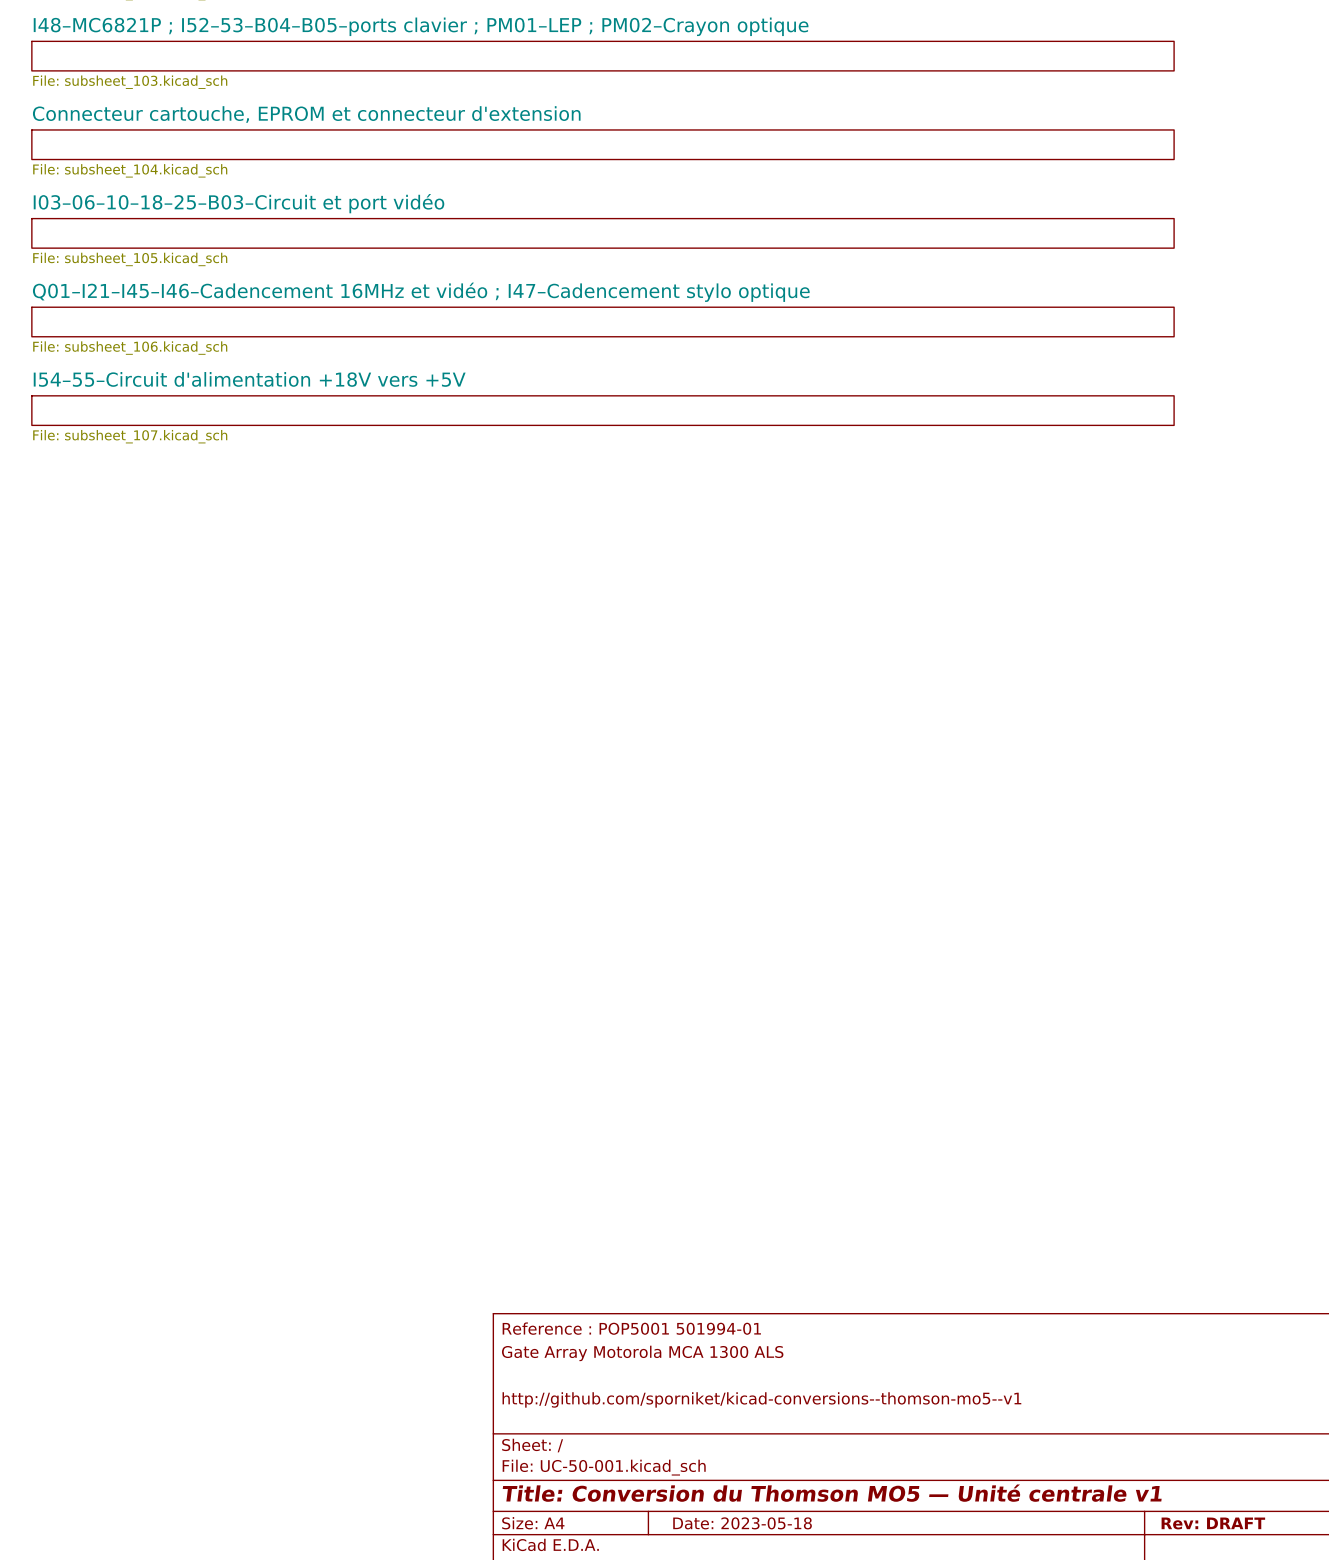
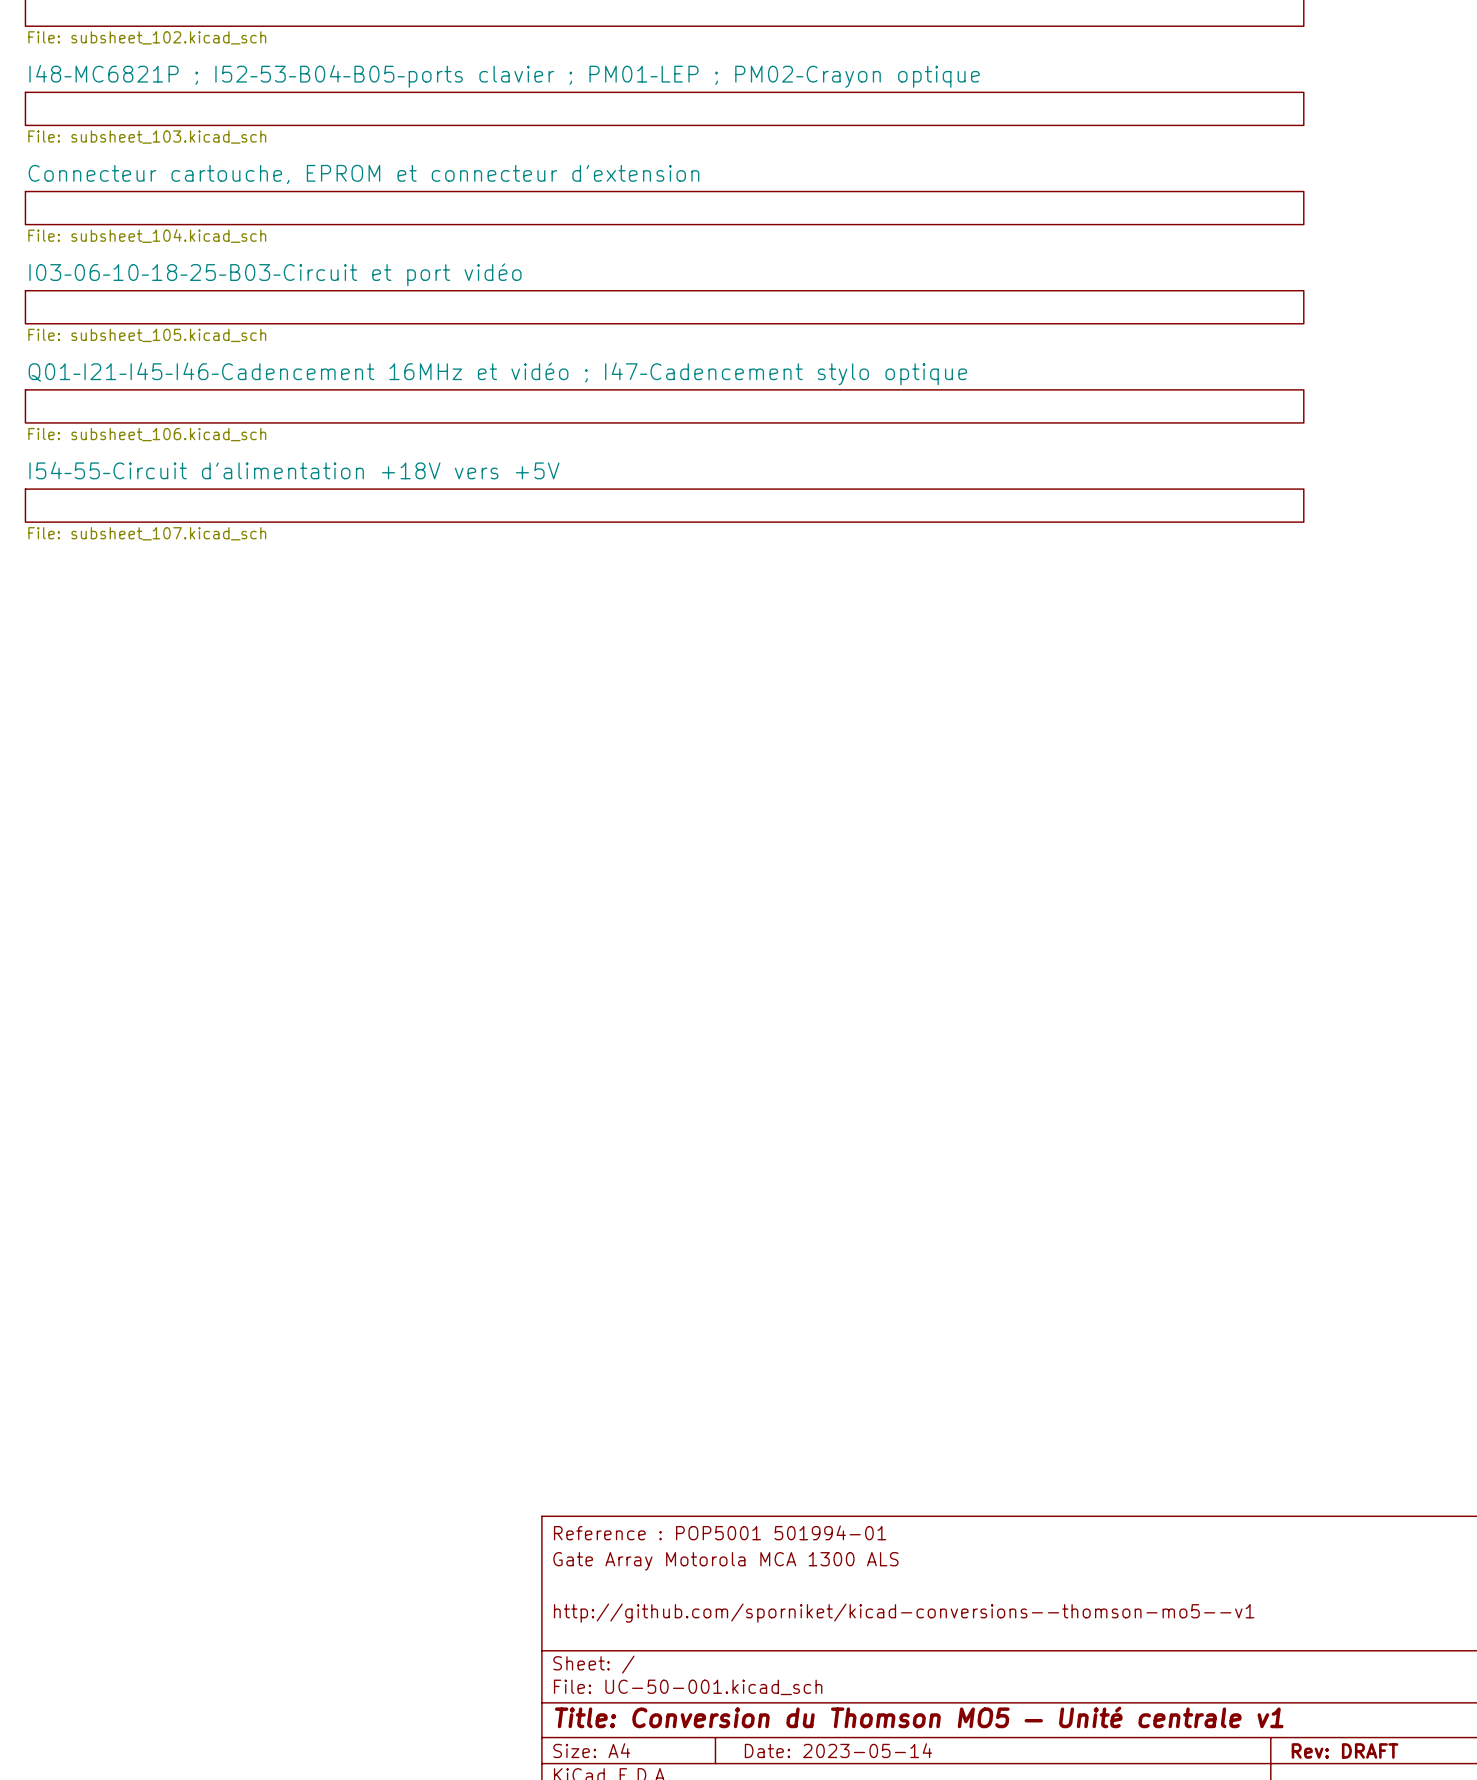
title block: Date: 2023-05-18 (742, 1523) -> Date: 2023-05-14 (838, 1750)

